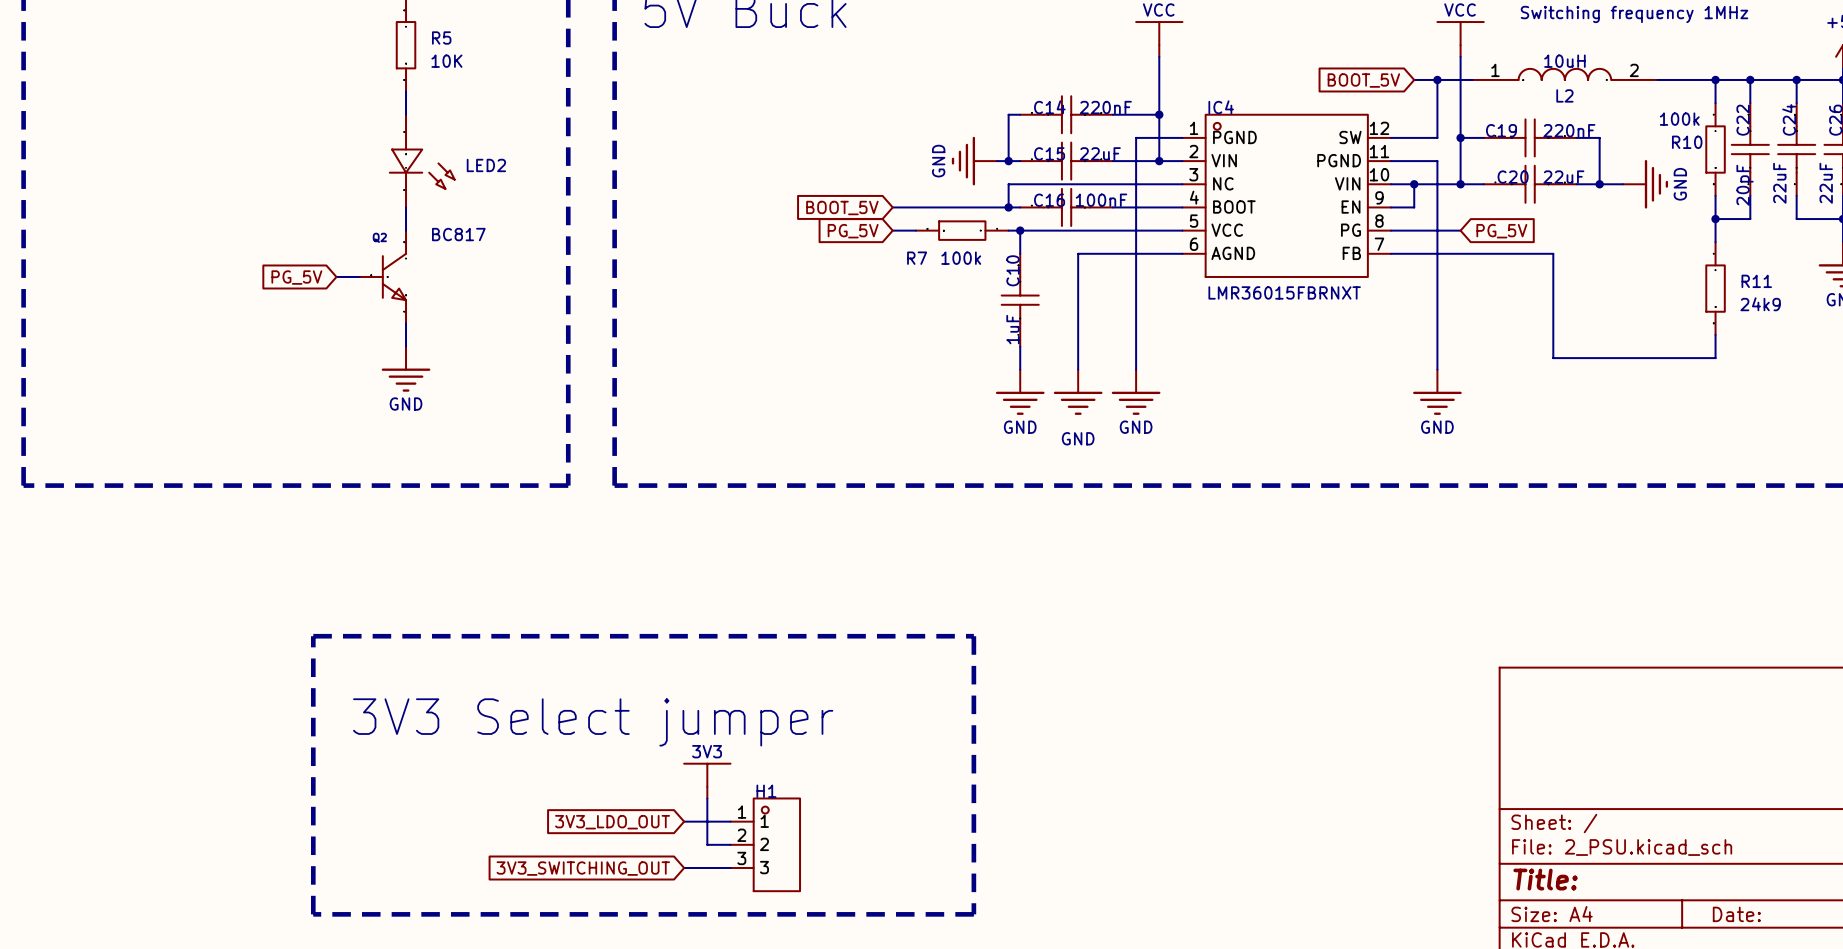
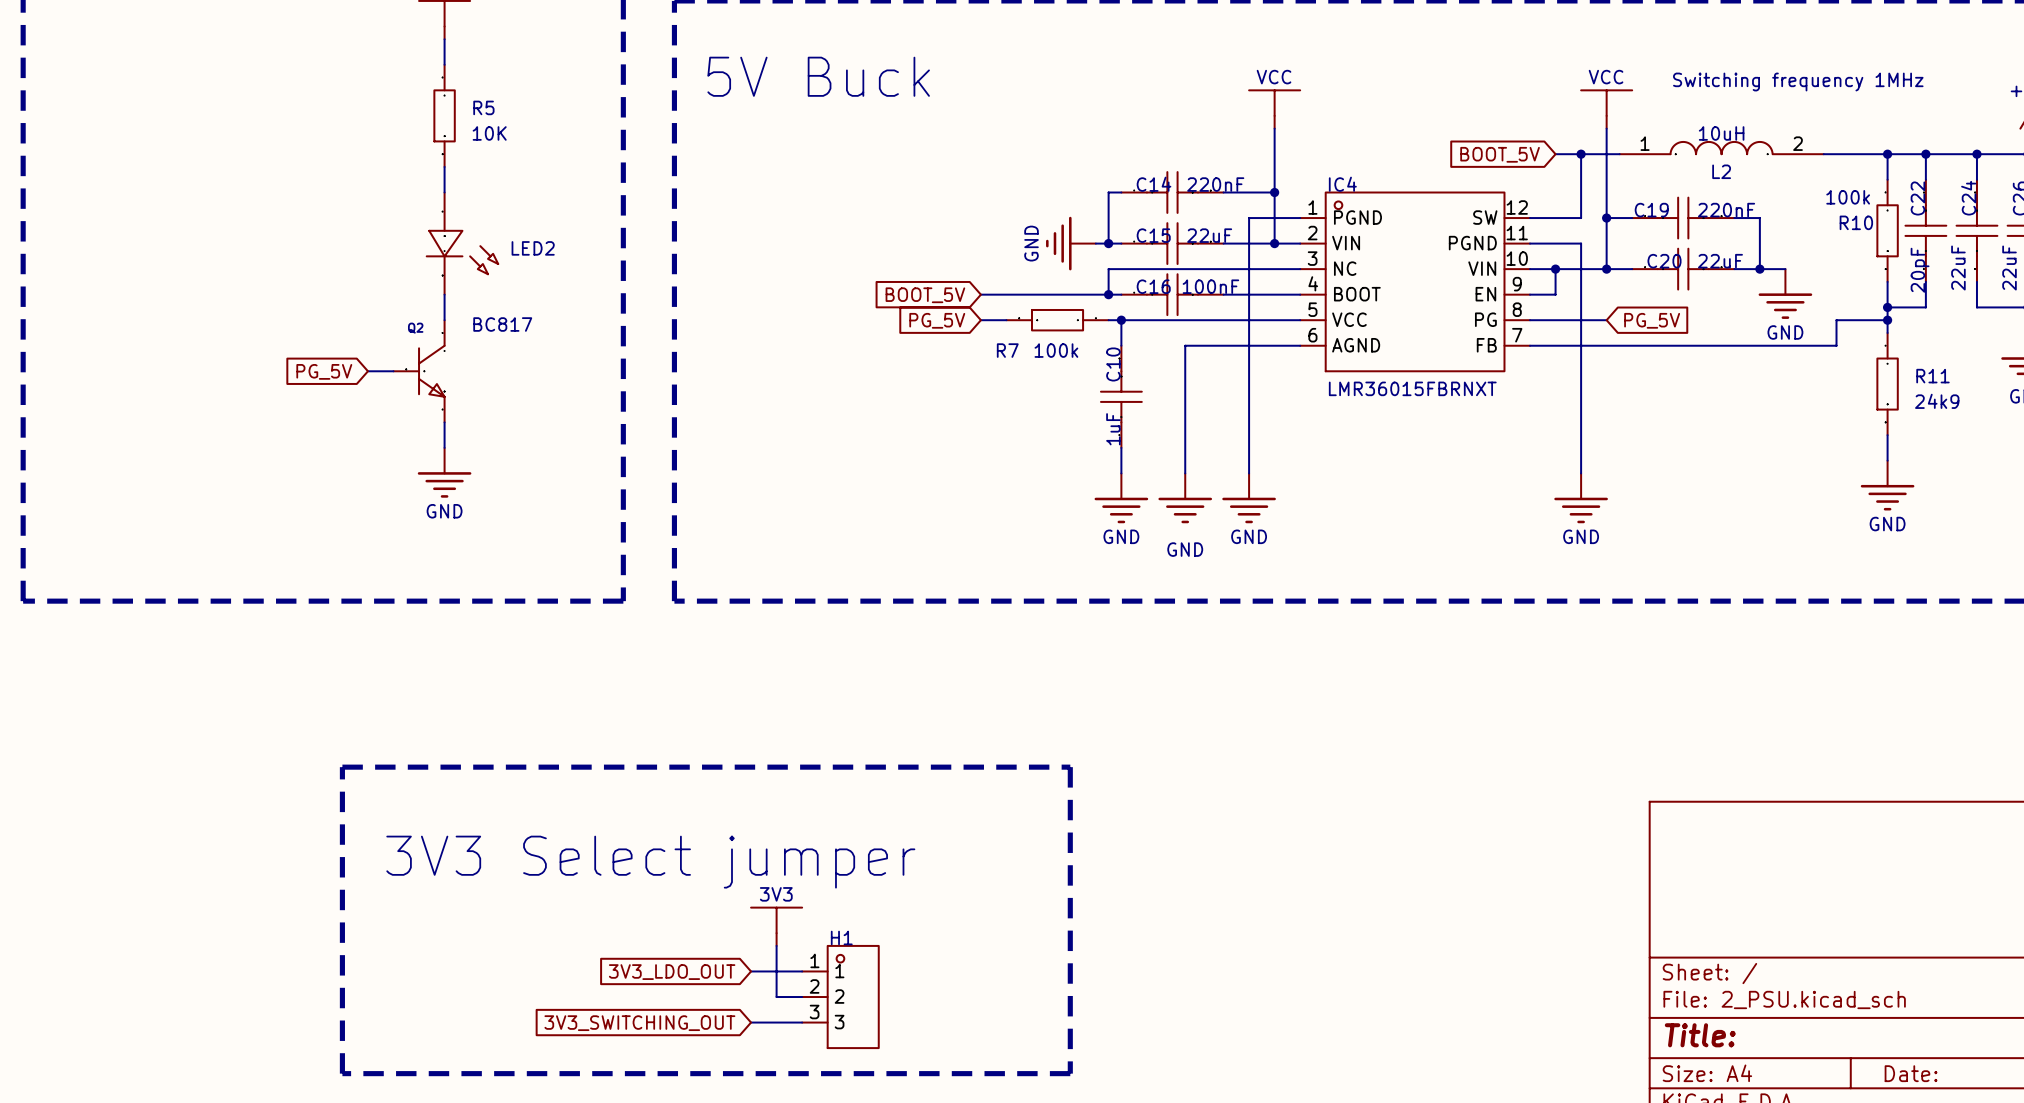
power symbol position: GND (1645, 184) -> GND (1785, 294)
power symbol rotation: 0° (1656, 184) -> 90° clockwise (1785, 306)
junction: none -> (1887, 320)
wire: (1553, 253) (1553, 358) (1715, 358) -> (1708, 345) (1836, 345) (1836, 320) (1887, 320)
power symbol: none -> GND (1887, 485)

